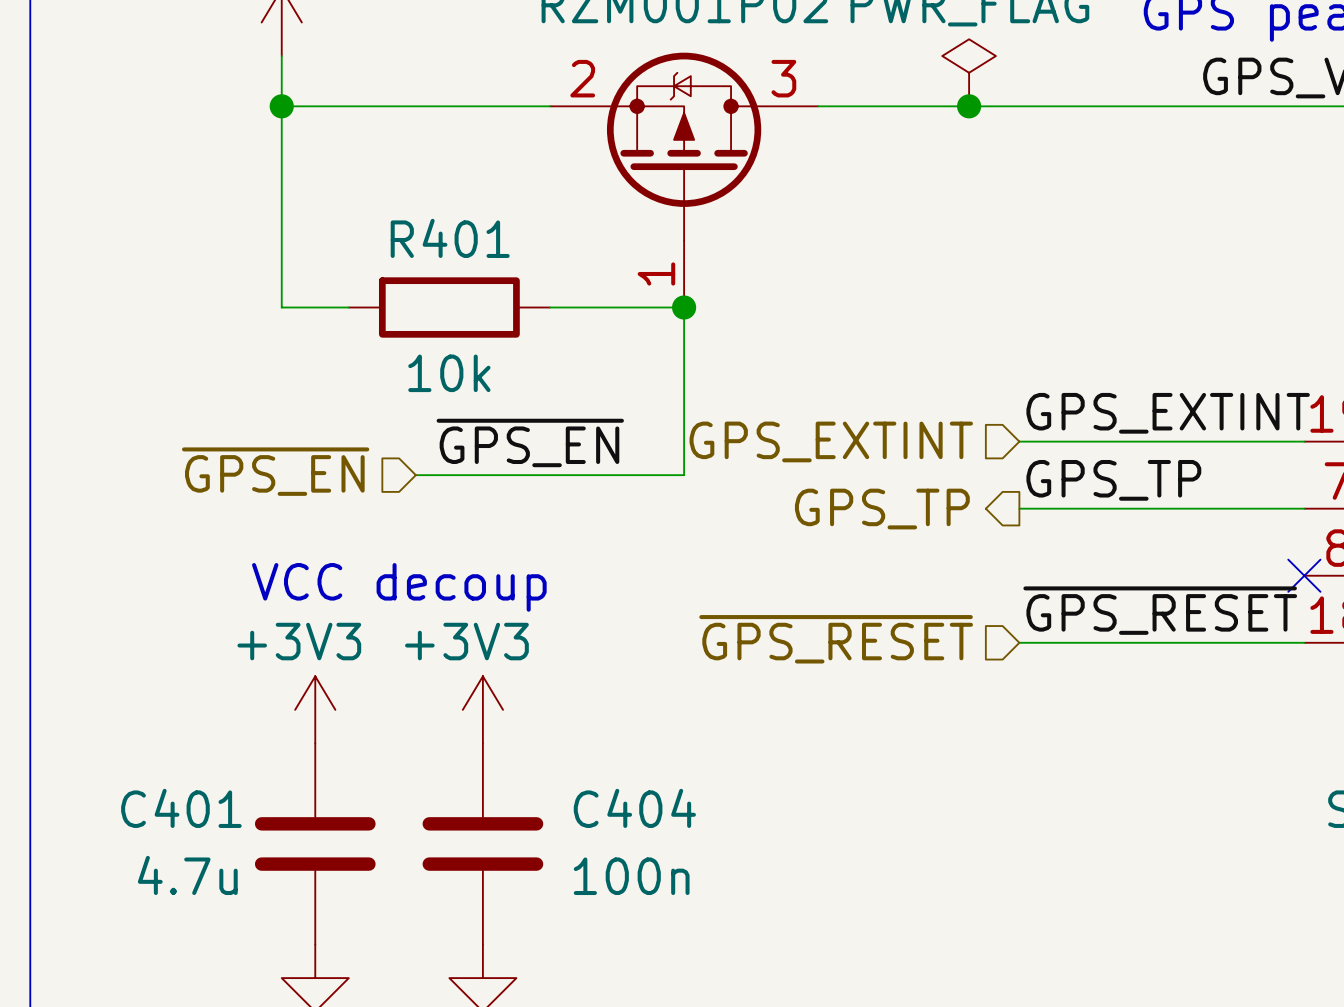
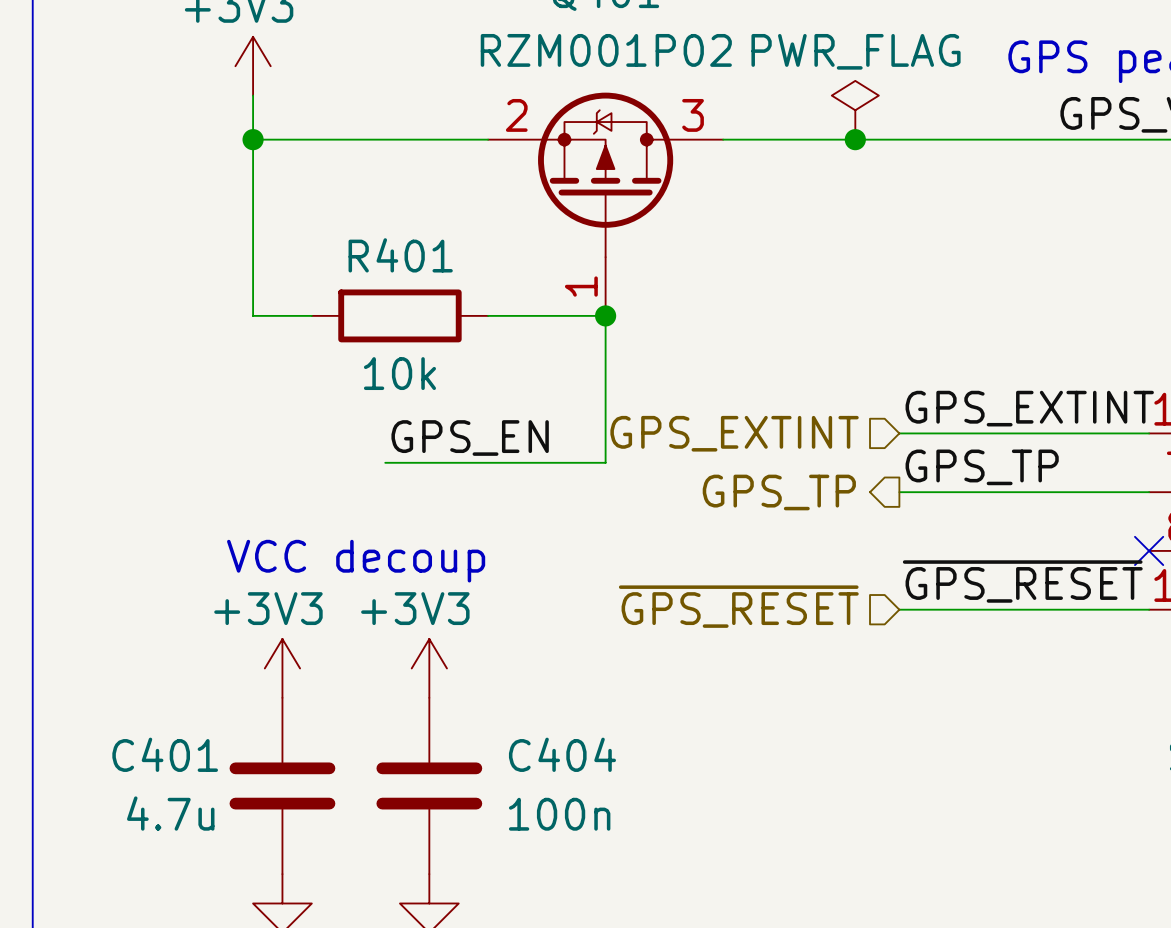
label: ~{GPS_EN} (530, 442) -> GPS_EN (470, 437)
hierarchical label: ~{GPS_EN} (275, 471) -> none
wire: (415, 475) (432, 475) -> none

